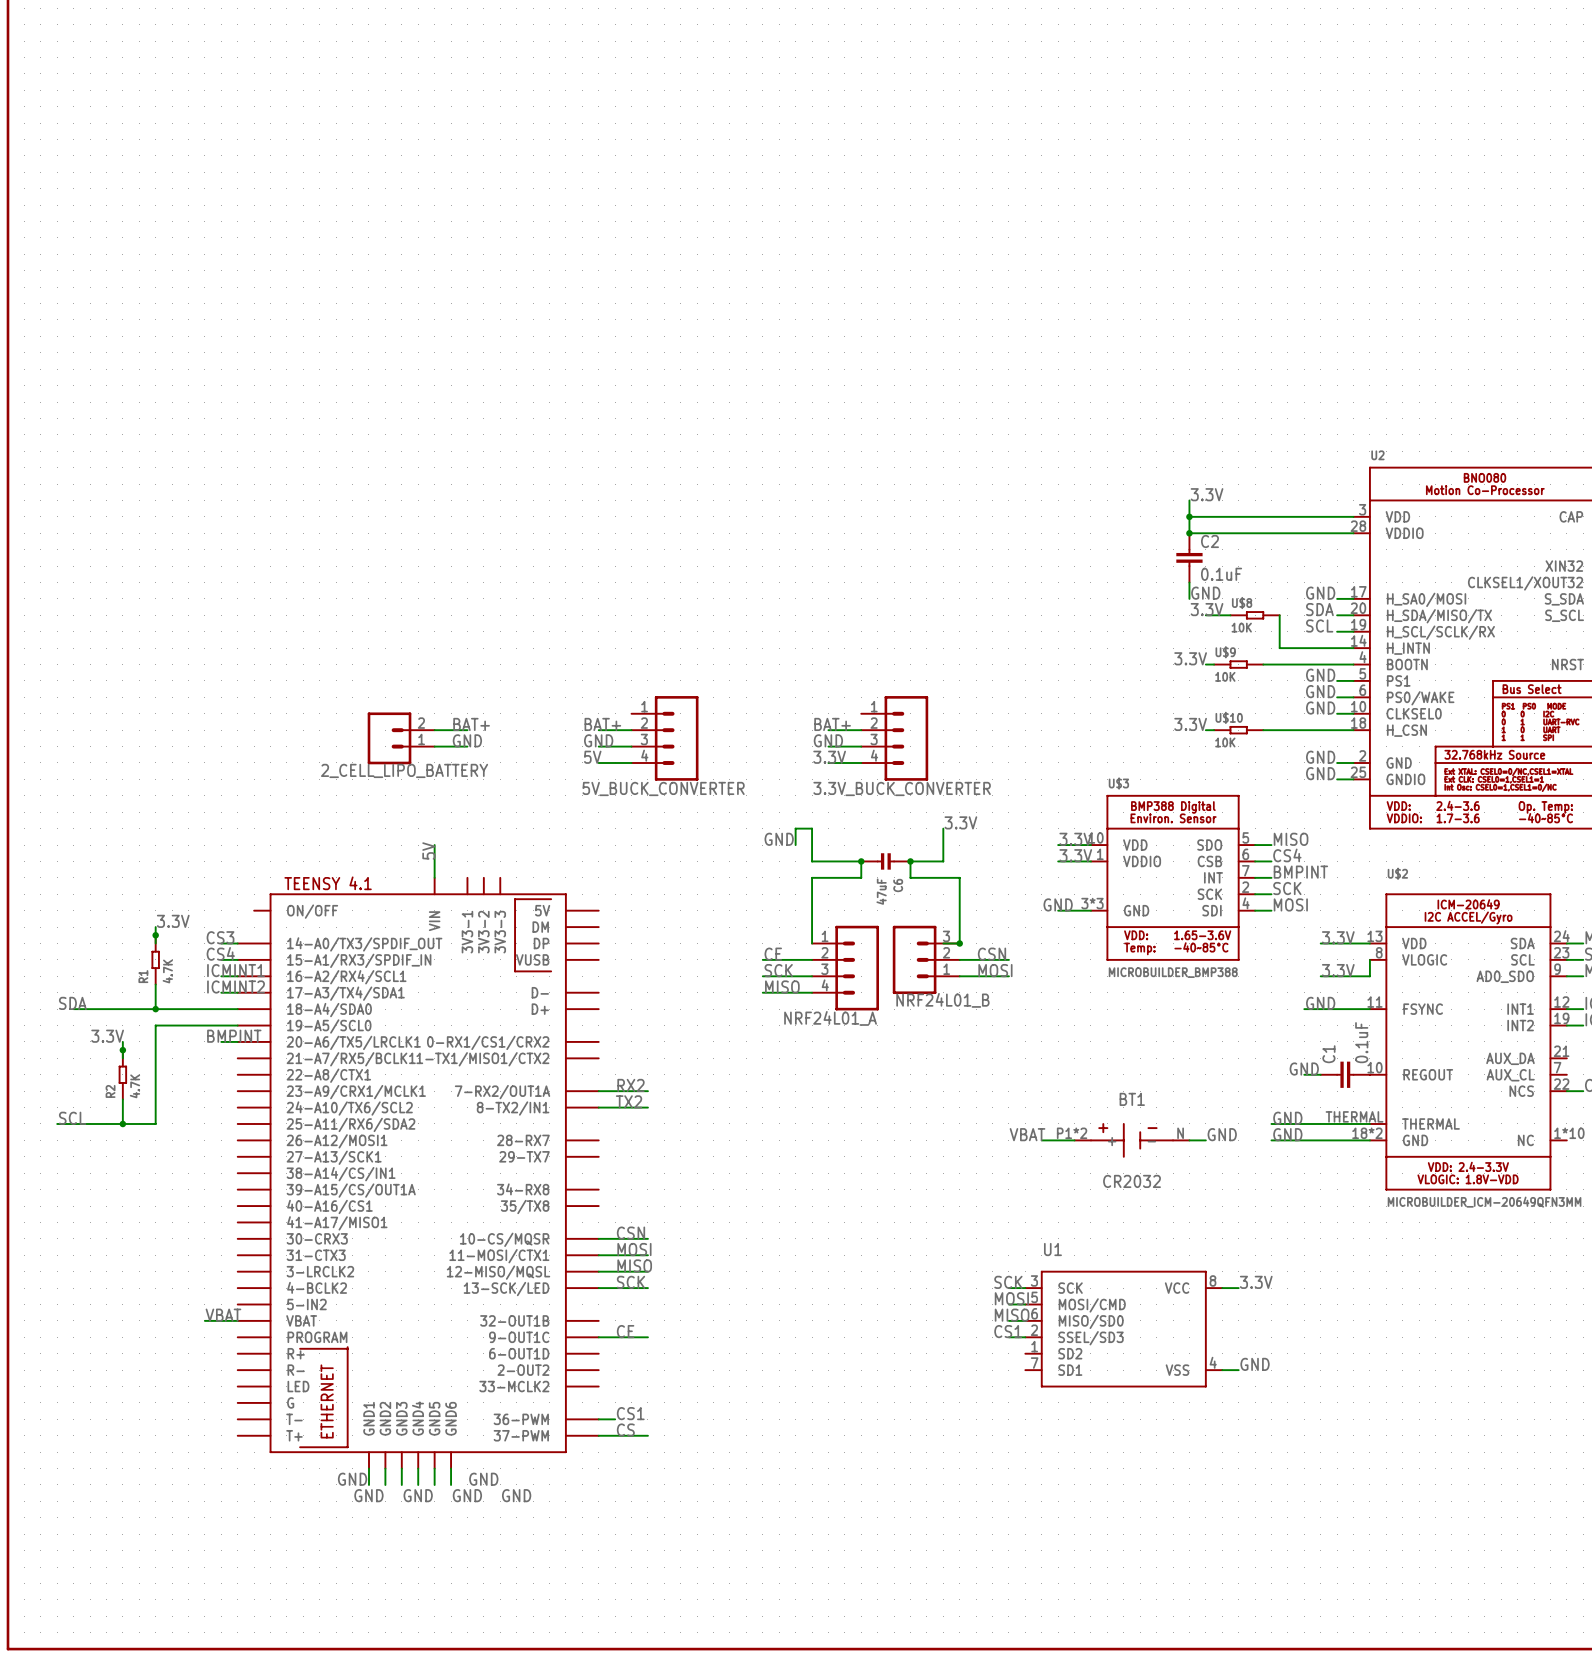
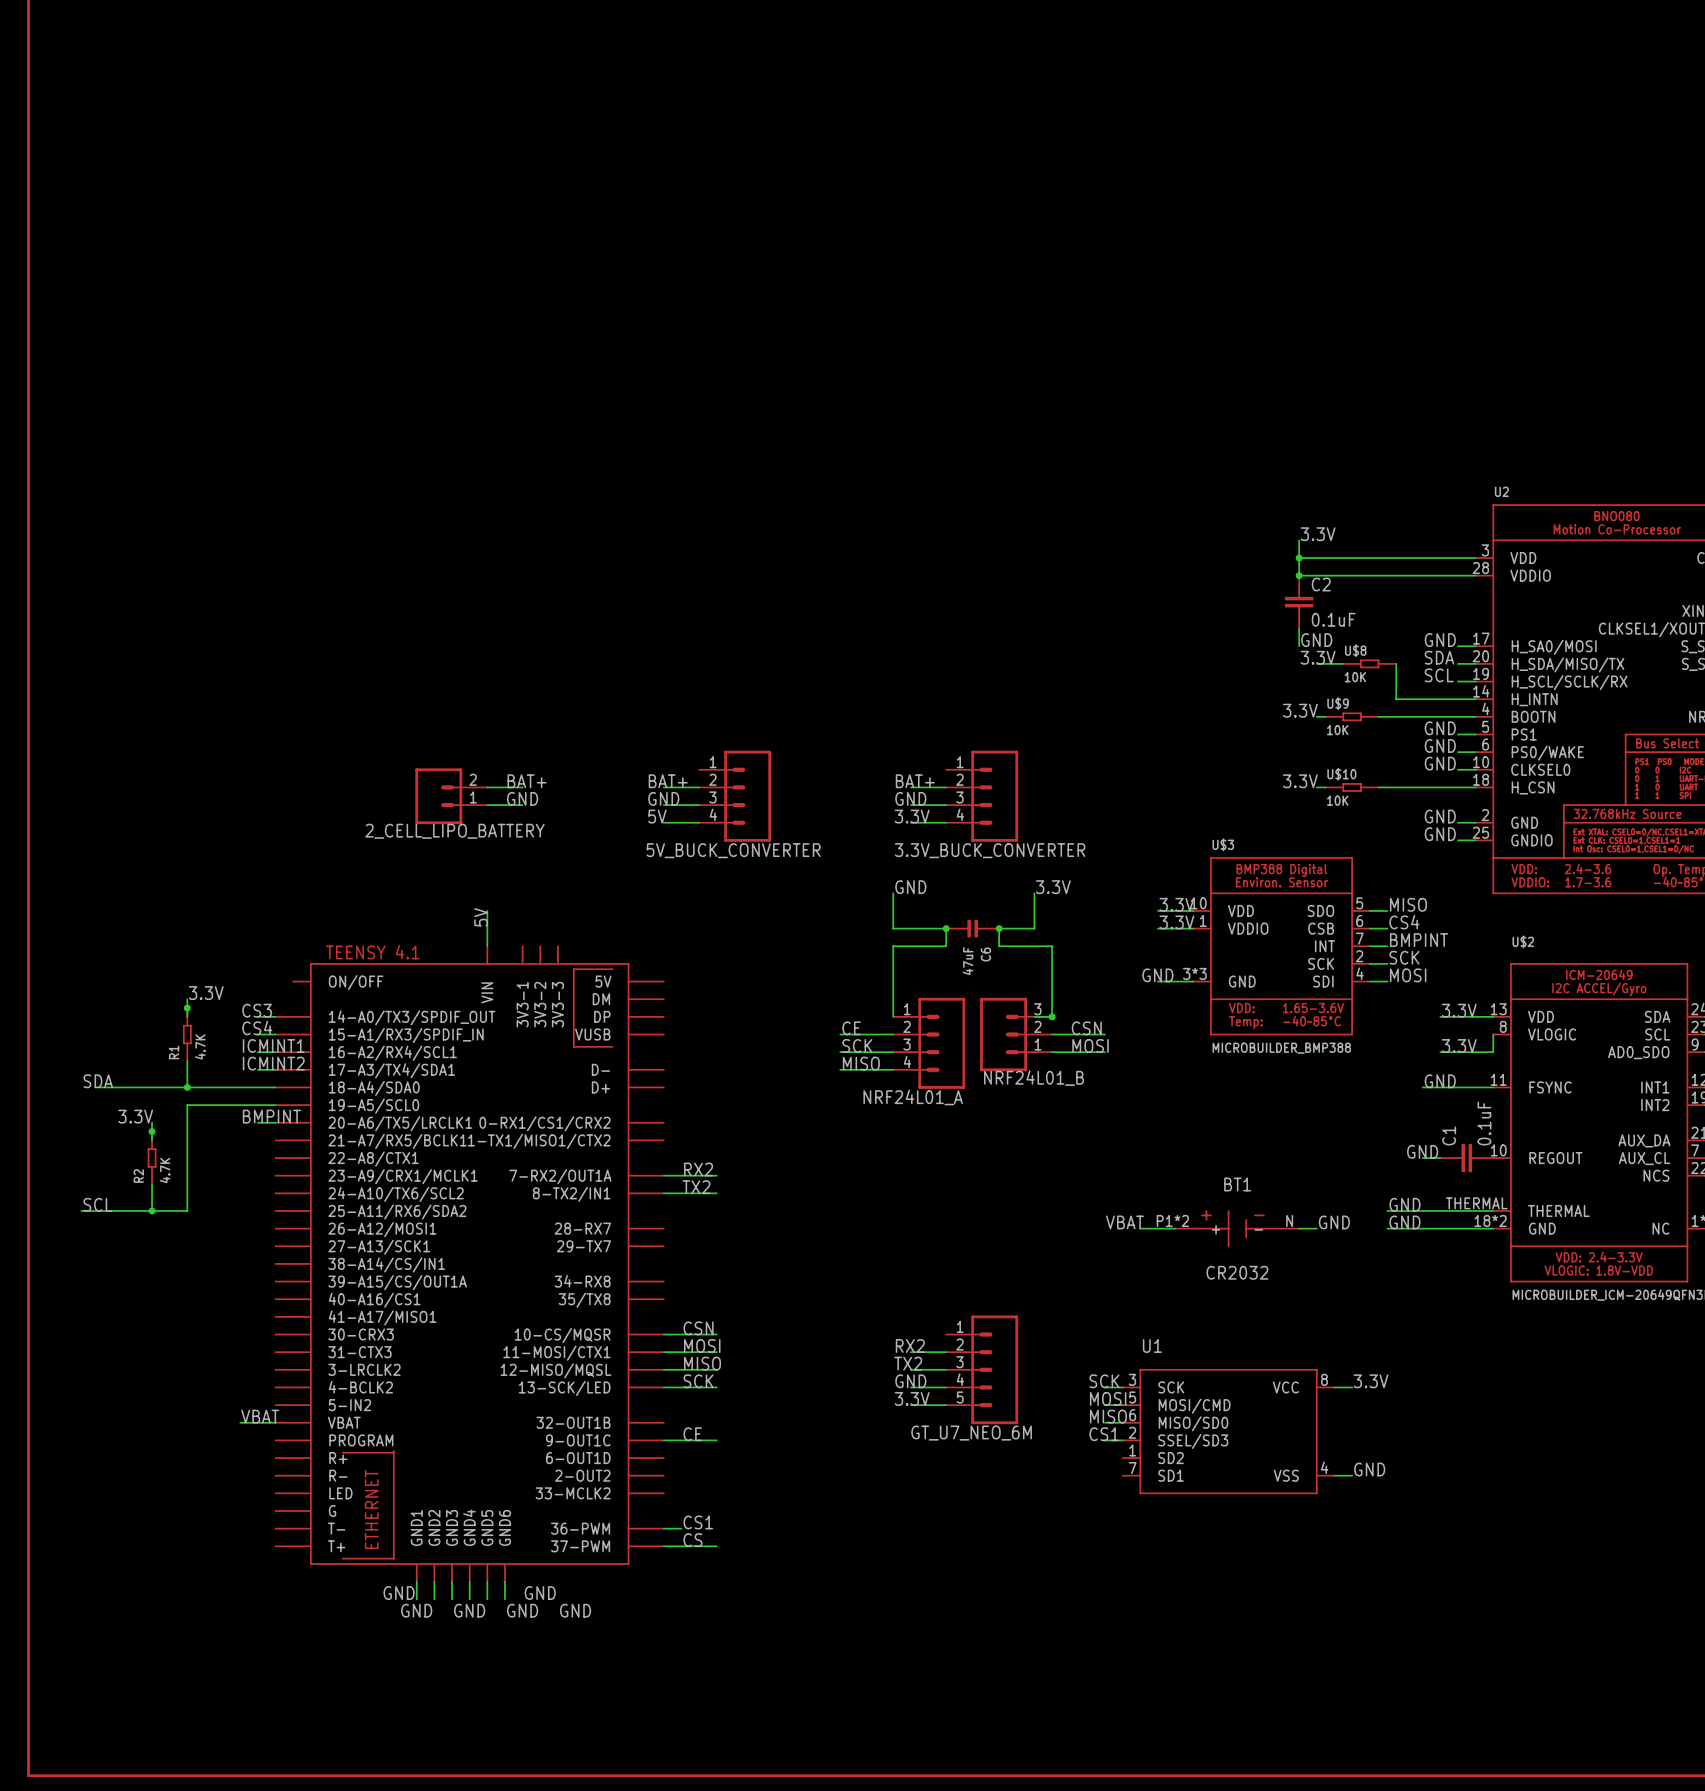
wire: (812, 828) (795, 828) (795, 845) -> none
label position: GND (779, 839) -> GND (910, 887)
label: none -> RX2 (910, 1346)
wire: none -> (910, 1352) (946, 1352)
label: none -> TX2 (908, 1363)
wire: none -> (910, 1369) (946, 1369)
GT_U7_NEO_6M: none -> (982, 1369)
label: none -> GND (910, 1381)
wire: none -> (910, 1387) (946, 1387)
label: none -> 3.3V (912, 1398)
wire: none -> (910, 1405) (946, 1405)

